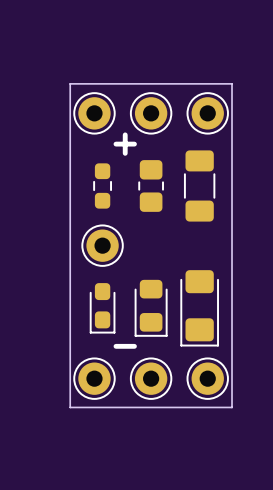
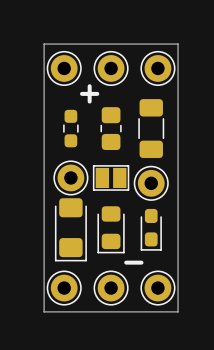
part: none -> (111, 177)
part: none -> (151, 183)
part footprint: [180, 270, 219, 347] -> [140, 208, 162, 251]
part footprint: [89, 283, 116, 334] -> [54, 198, 87, 262]
text position: - (125, 346) -> - (133, 262)

